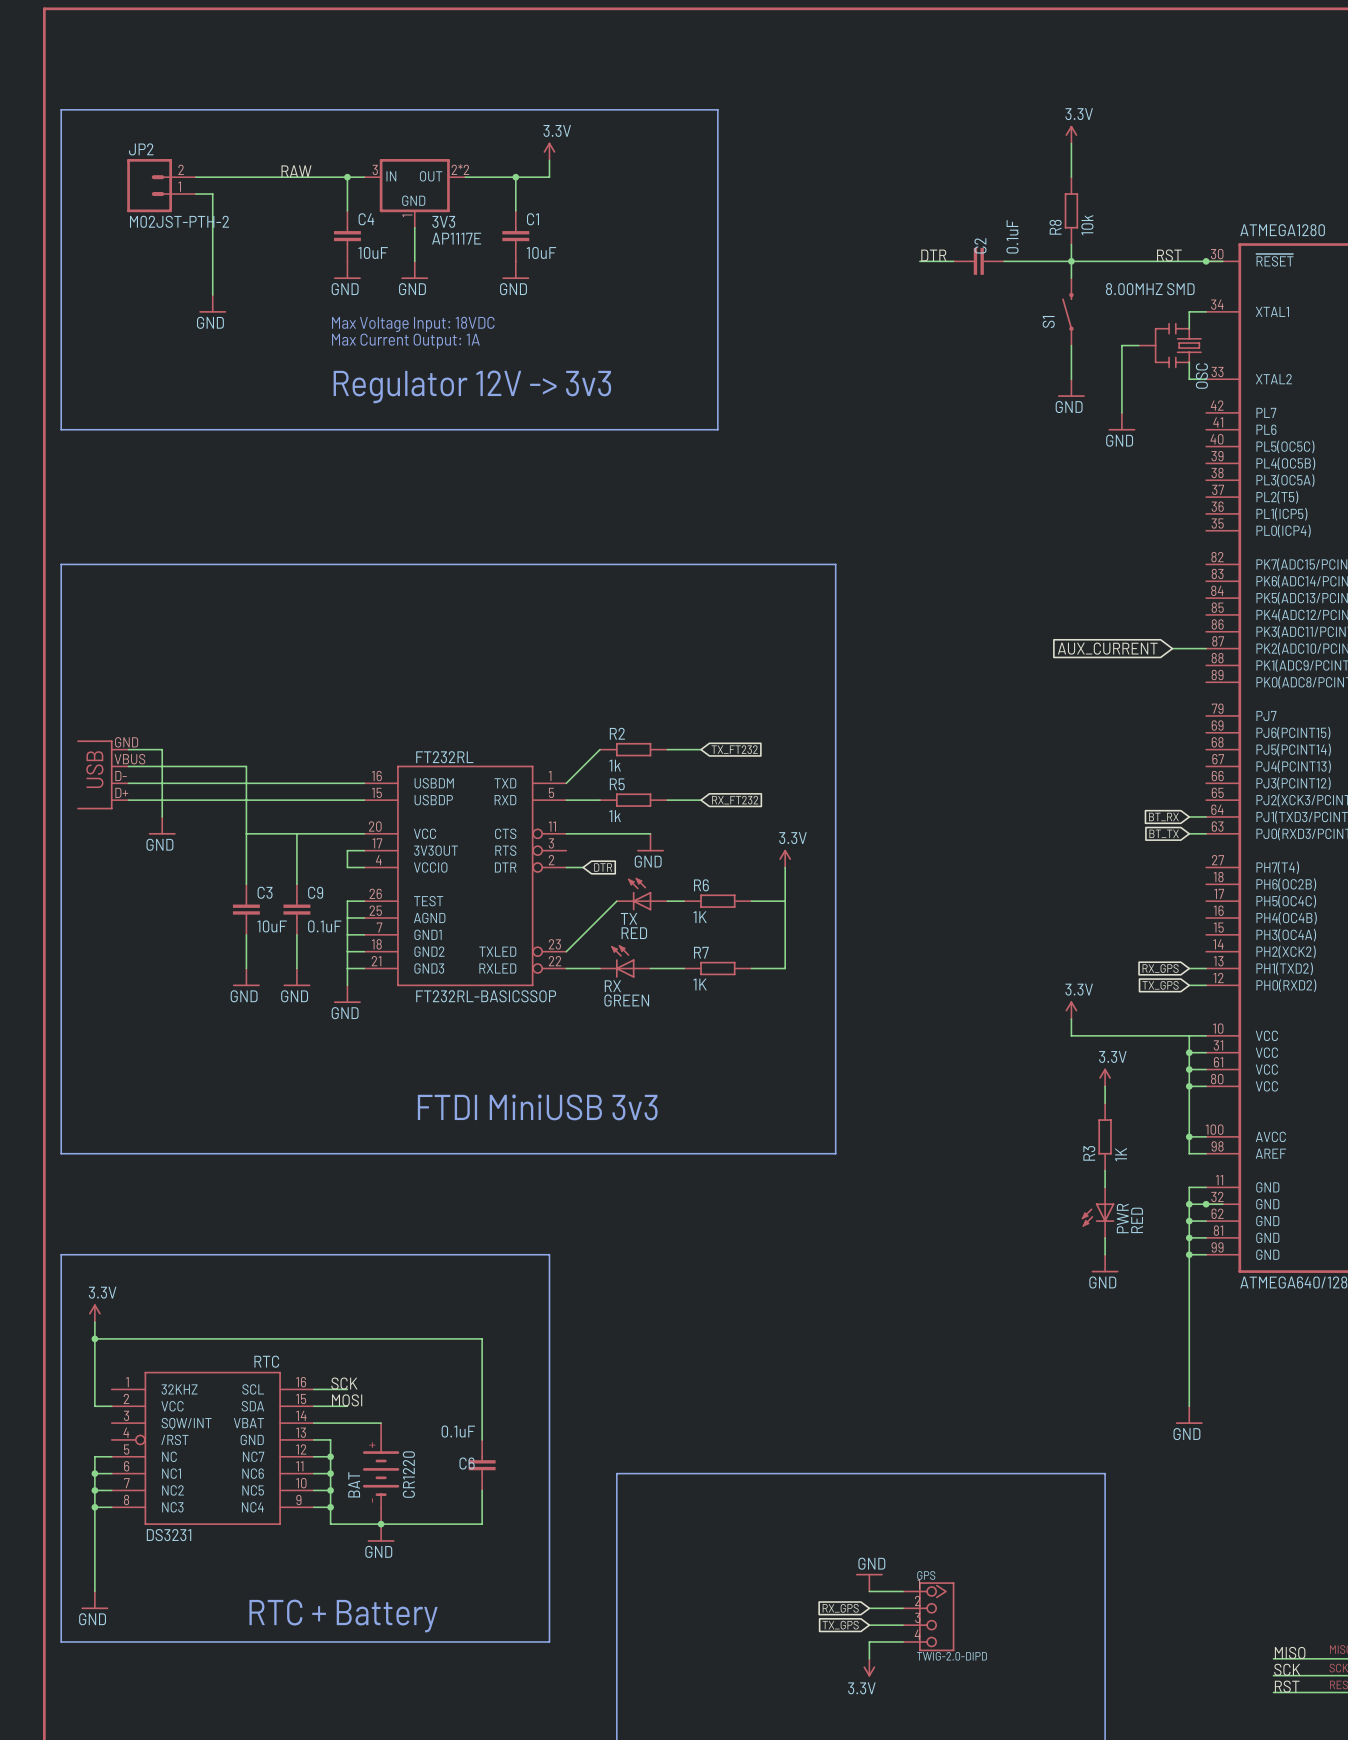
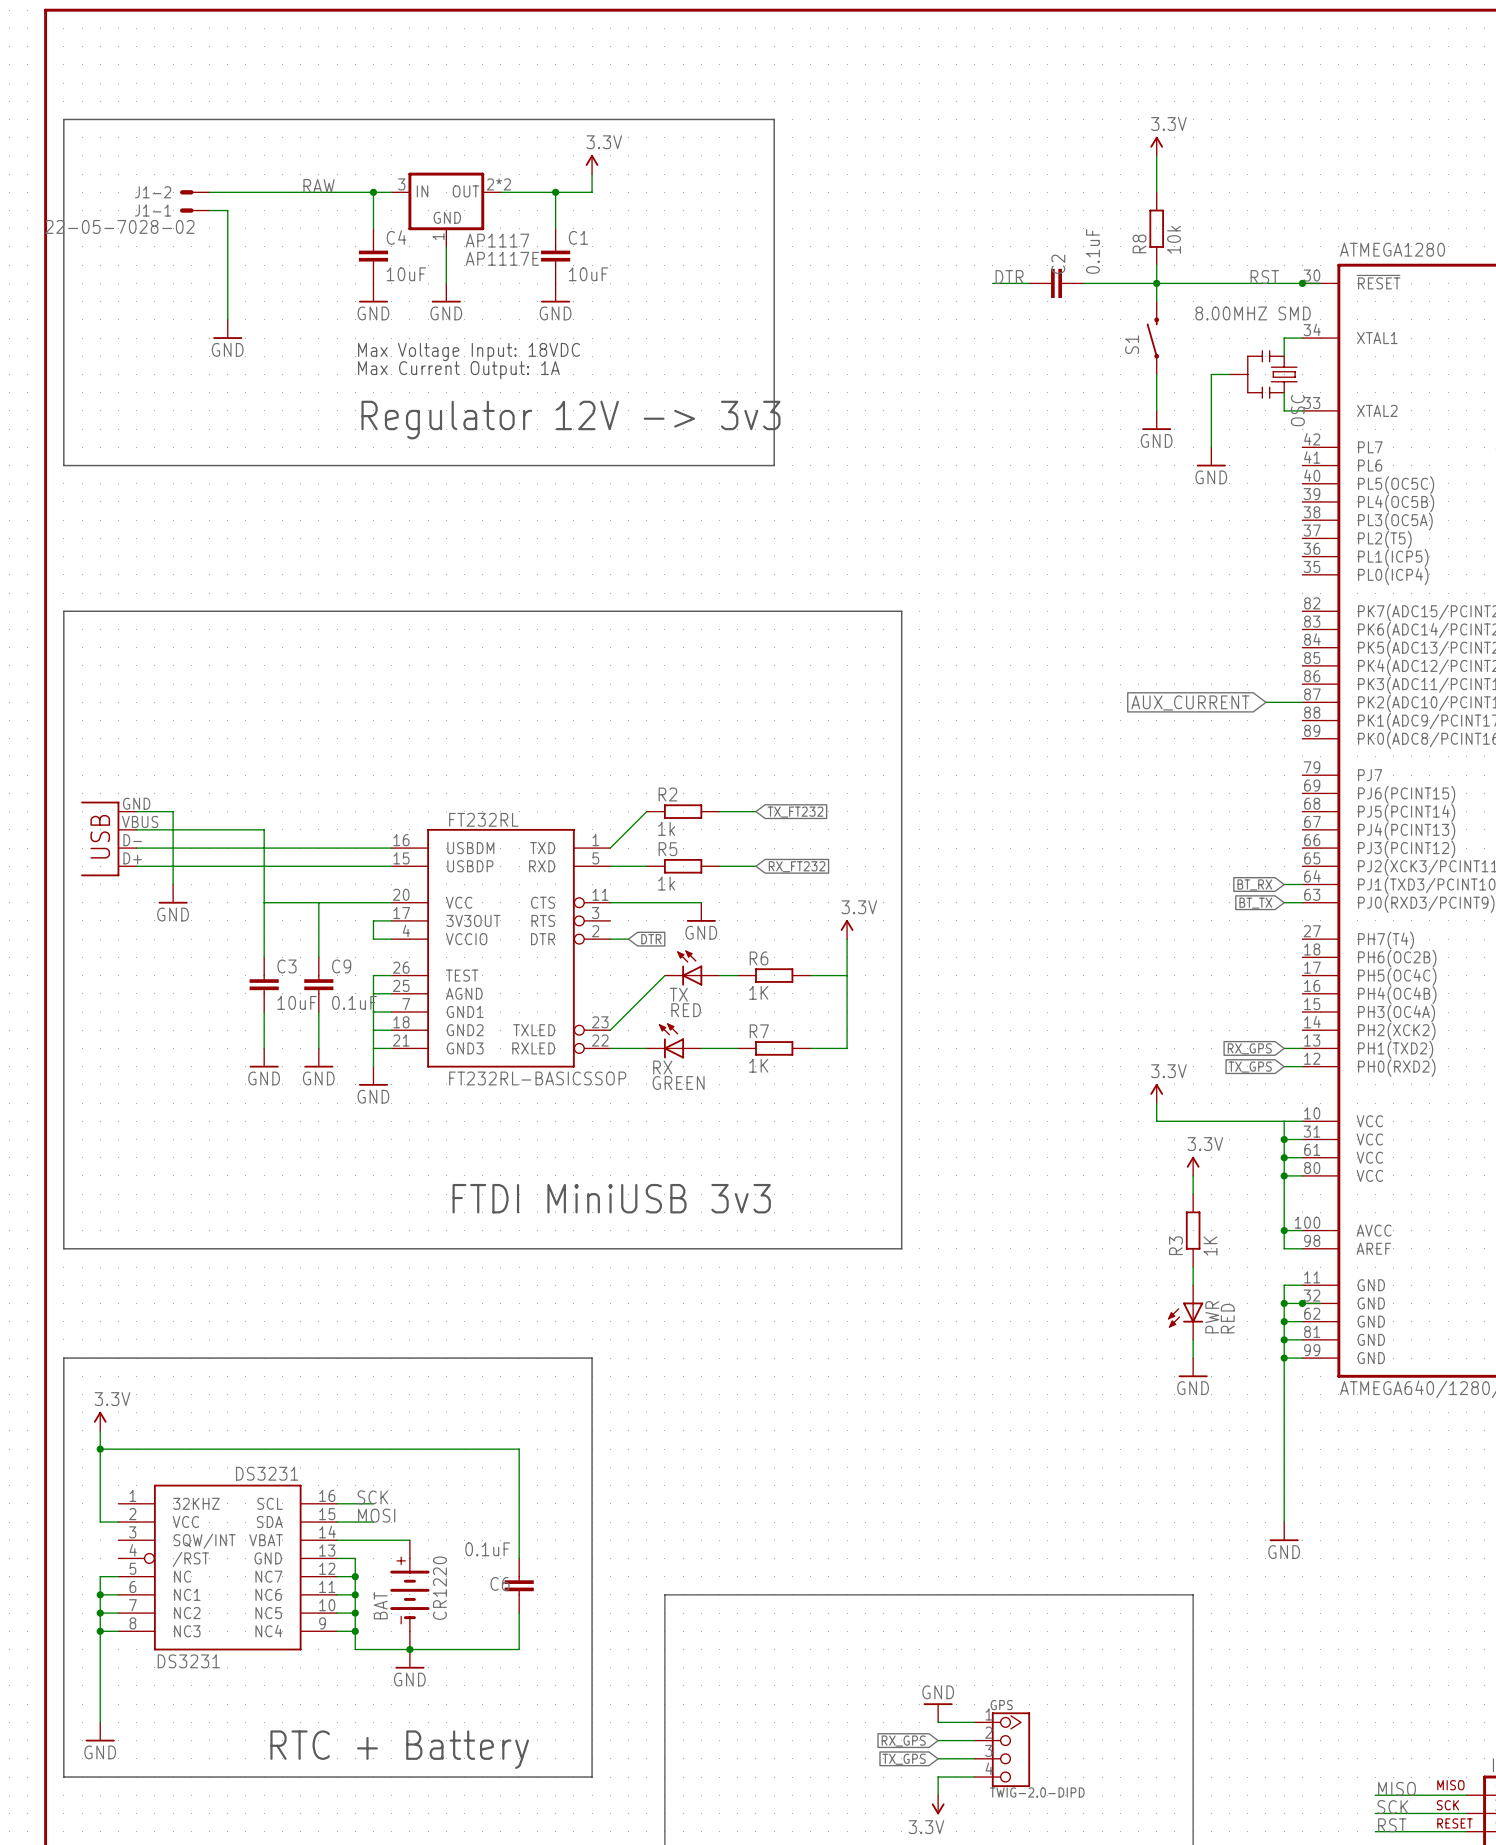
J1-2: none -> (194, 192)
JP2: M02JST-PTH-2 (161, 185) -> none
J1-1: none -> 22-05-7028-02 (194, 210)
3V3 name: 3V3 (443, 221) -> AP1117 (497, 240)
RTC name: RTC (266, 1361) -> DS3231 (267, 1473)

